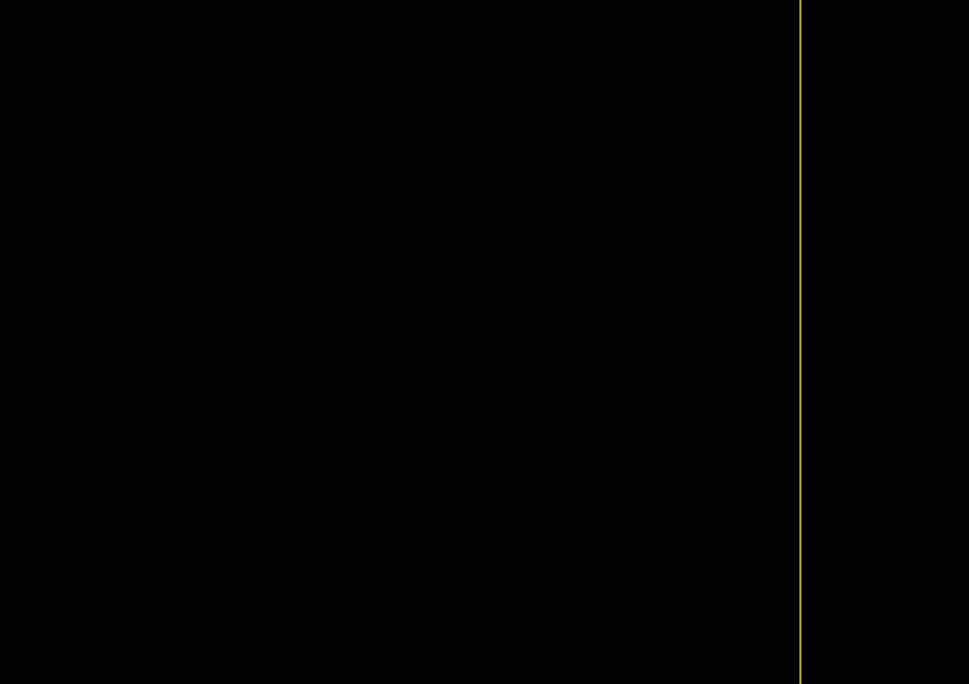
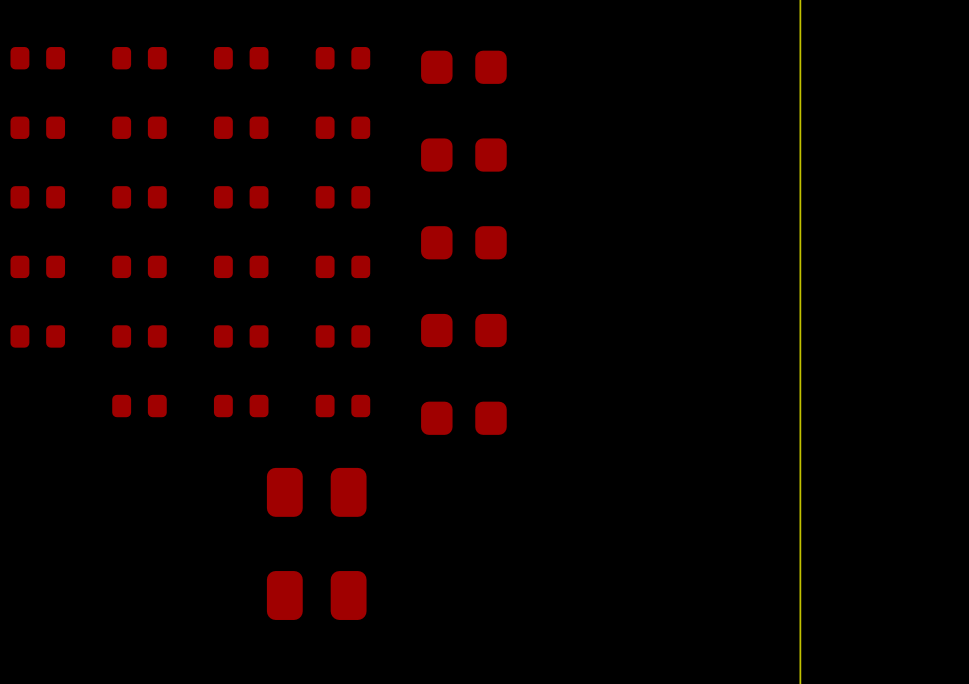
part: none -> (37, 58)
part: none -> (139, 58)
part: none -> (241, 58)
part: none -> (342, 58)
part: none -> (463, 67)
part: none -> (37, 127)
part: none -> (139, 127)
part: none -> (241, 127)
part: none -> (342, 127)
part: none -> (463, 155)
part: none -> (37, 197)
part: none -> (139, 197)
part: none -> (241, 197)
part: none -> (342, 197)
part: none -> (463, 242)
part: none -> (37, 266)
part: none -> (139, 266)
part: none -> (241, 266)
part: none -> (342, 266)
part: none -> (463, 330)
part: none -> (37, 336)
part: none -> (139, 336)
part: none -> (241, 336)
part: none -> (342, 336)
part: none -> (139, 406)
part: none -> (241, 406)
part: none -> (342, 406)
part: none -> (463, 418)
part: none -> (316, 492)
part: none -> (316, 595)

